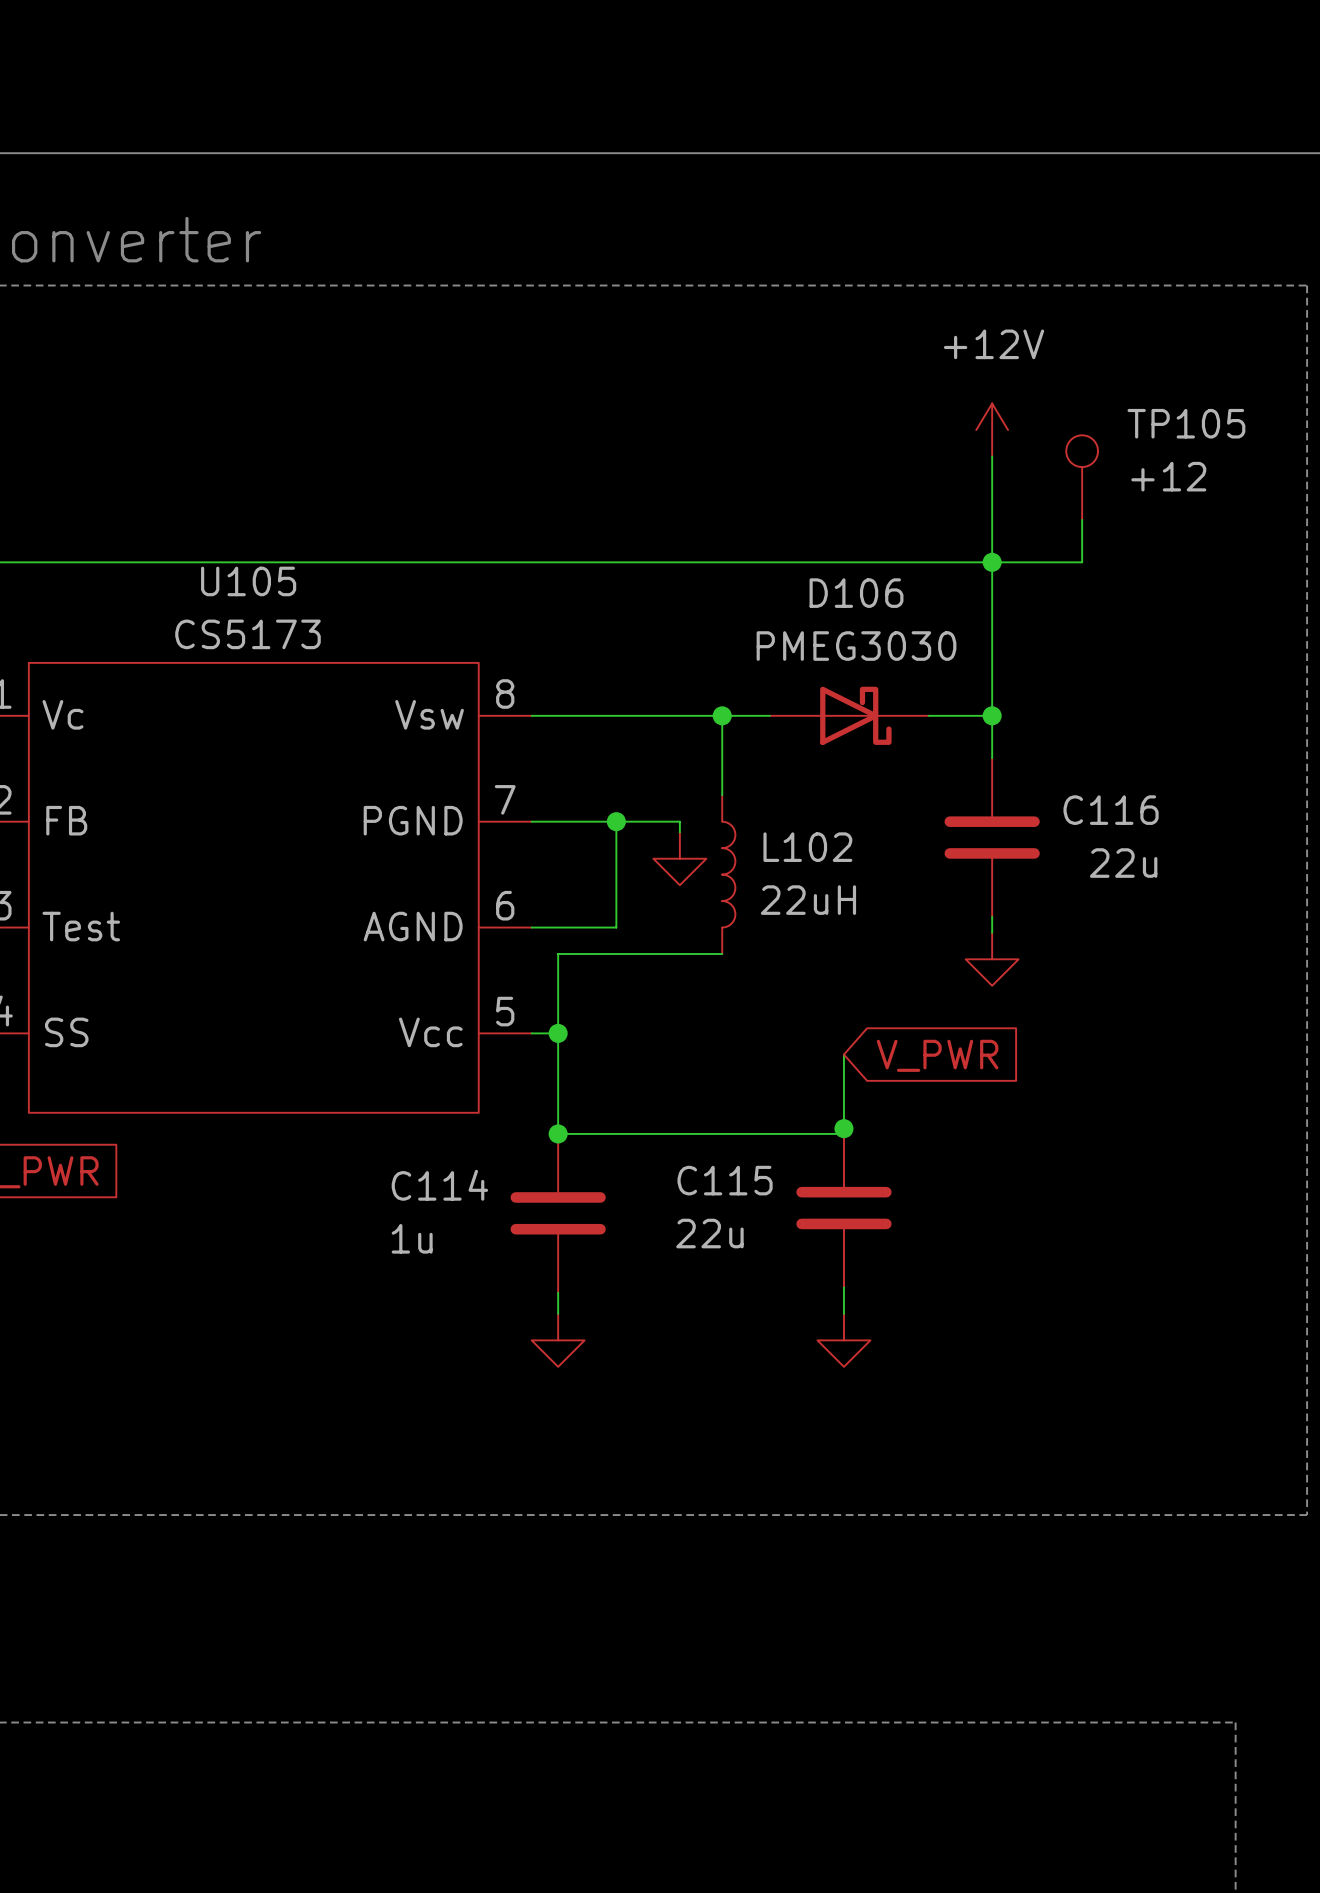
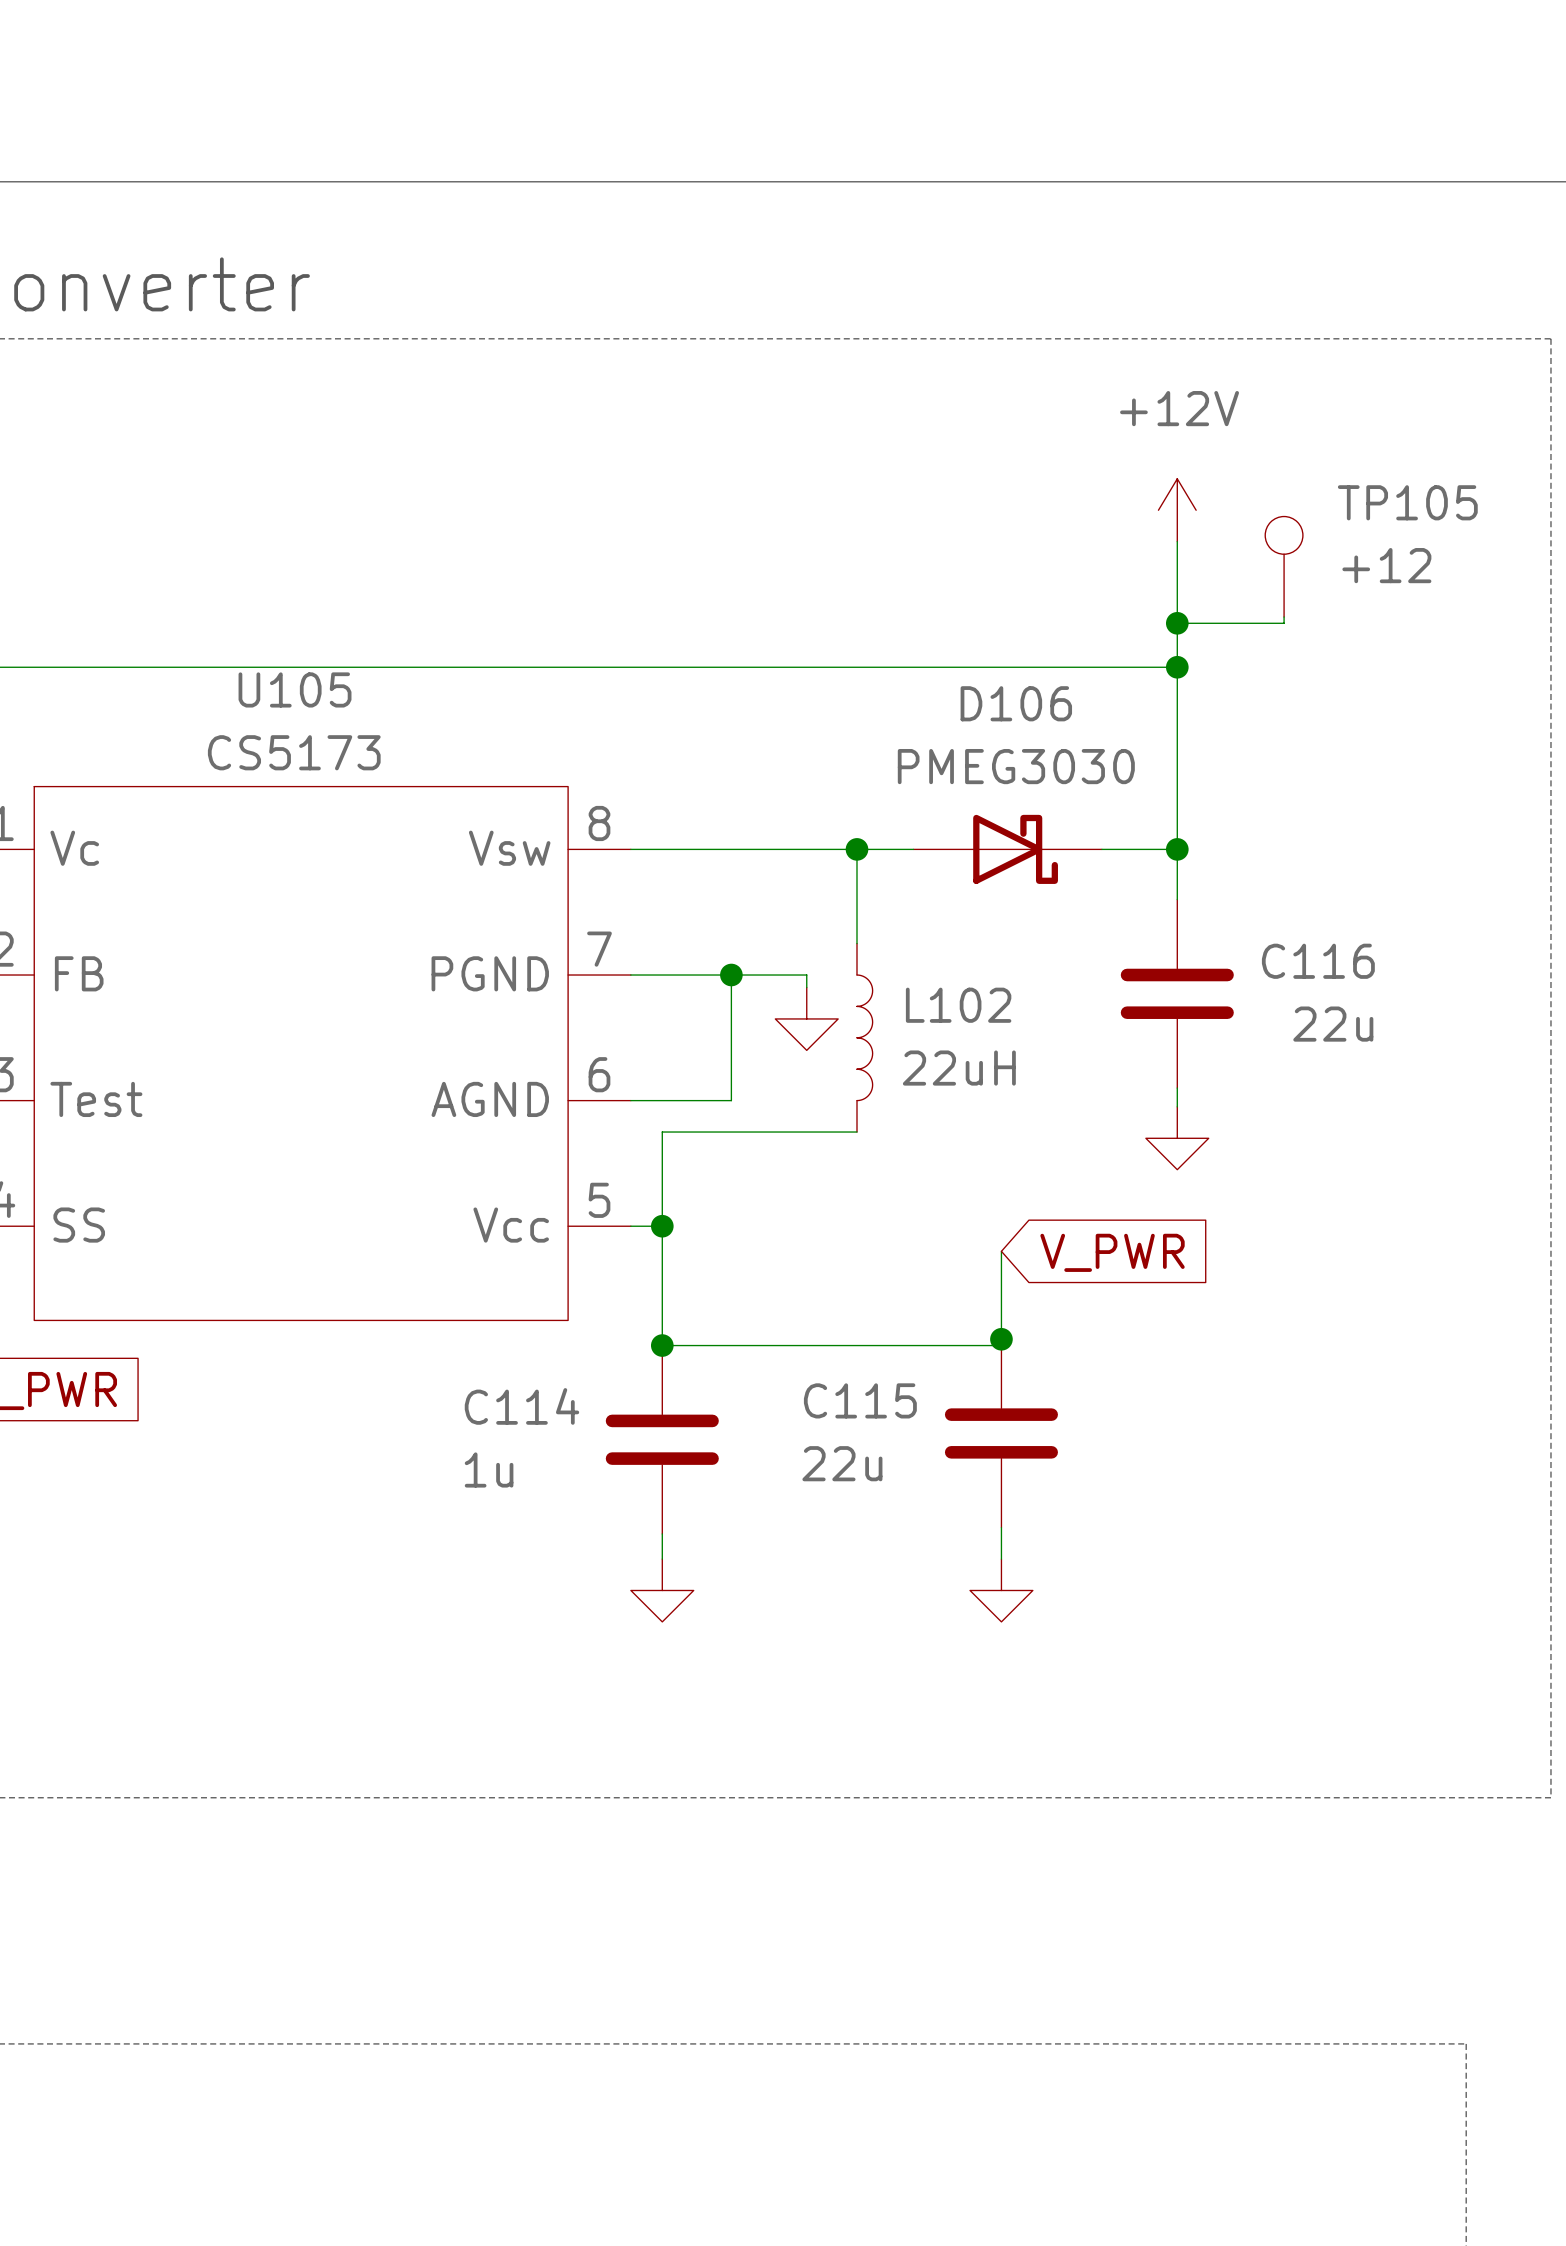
junction: none -> (1177, 623)
wire: (1082, 525) (1082, 562) (992, 562) -> (1284, 623) (1177, 623)

